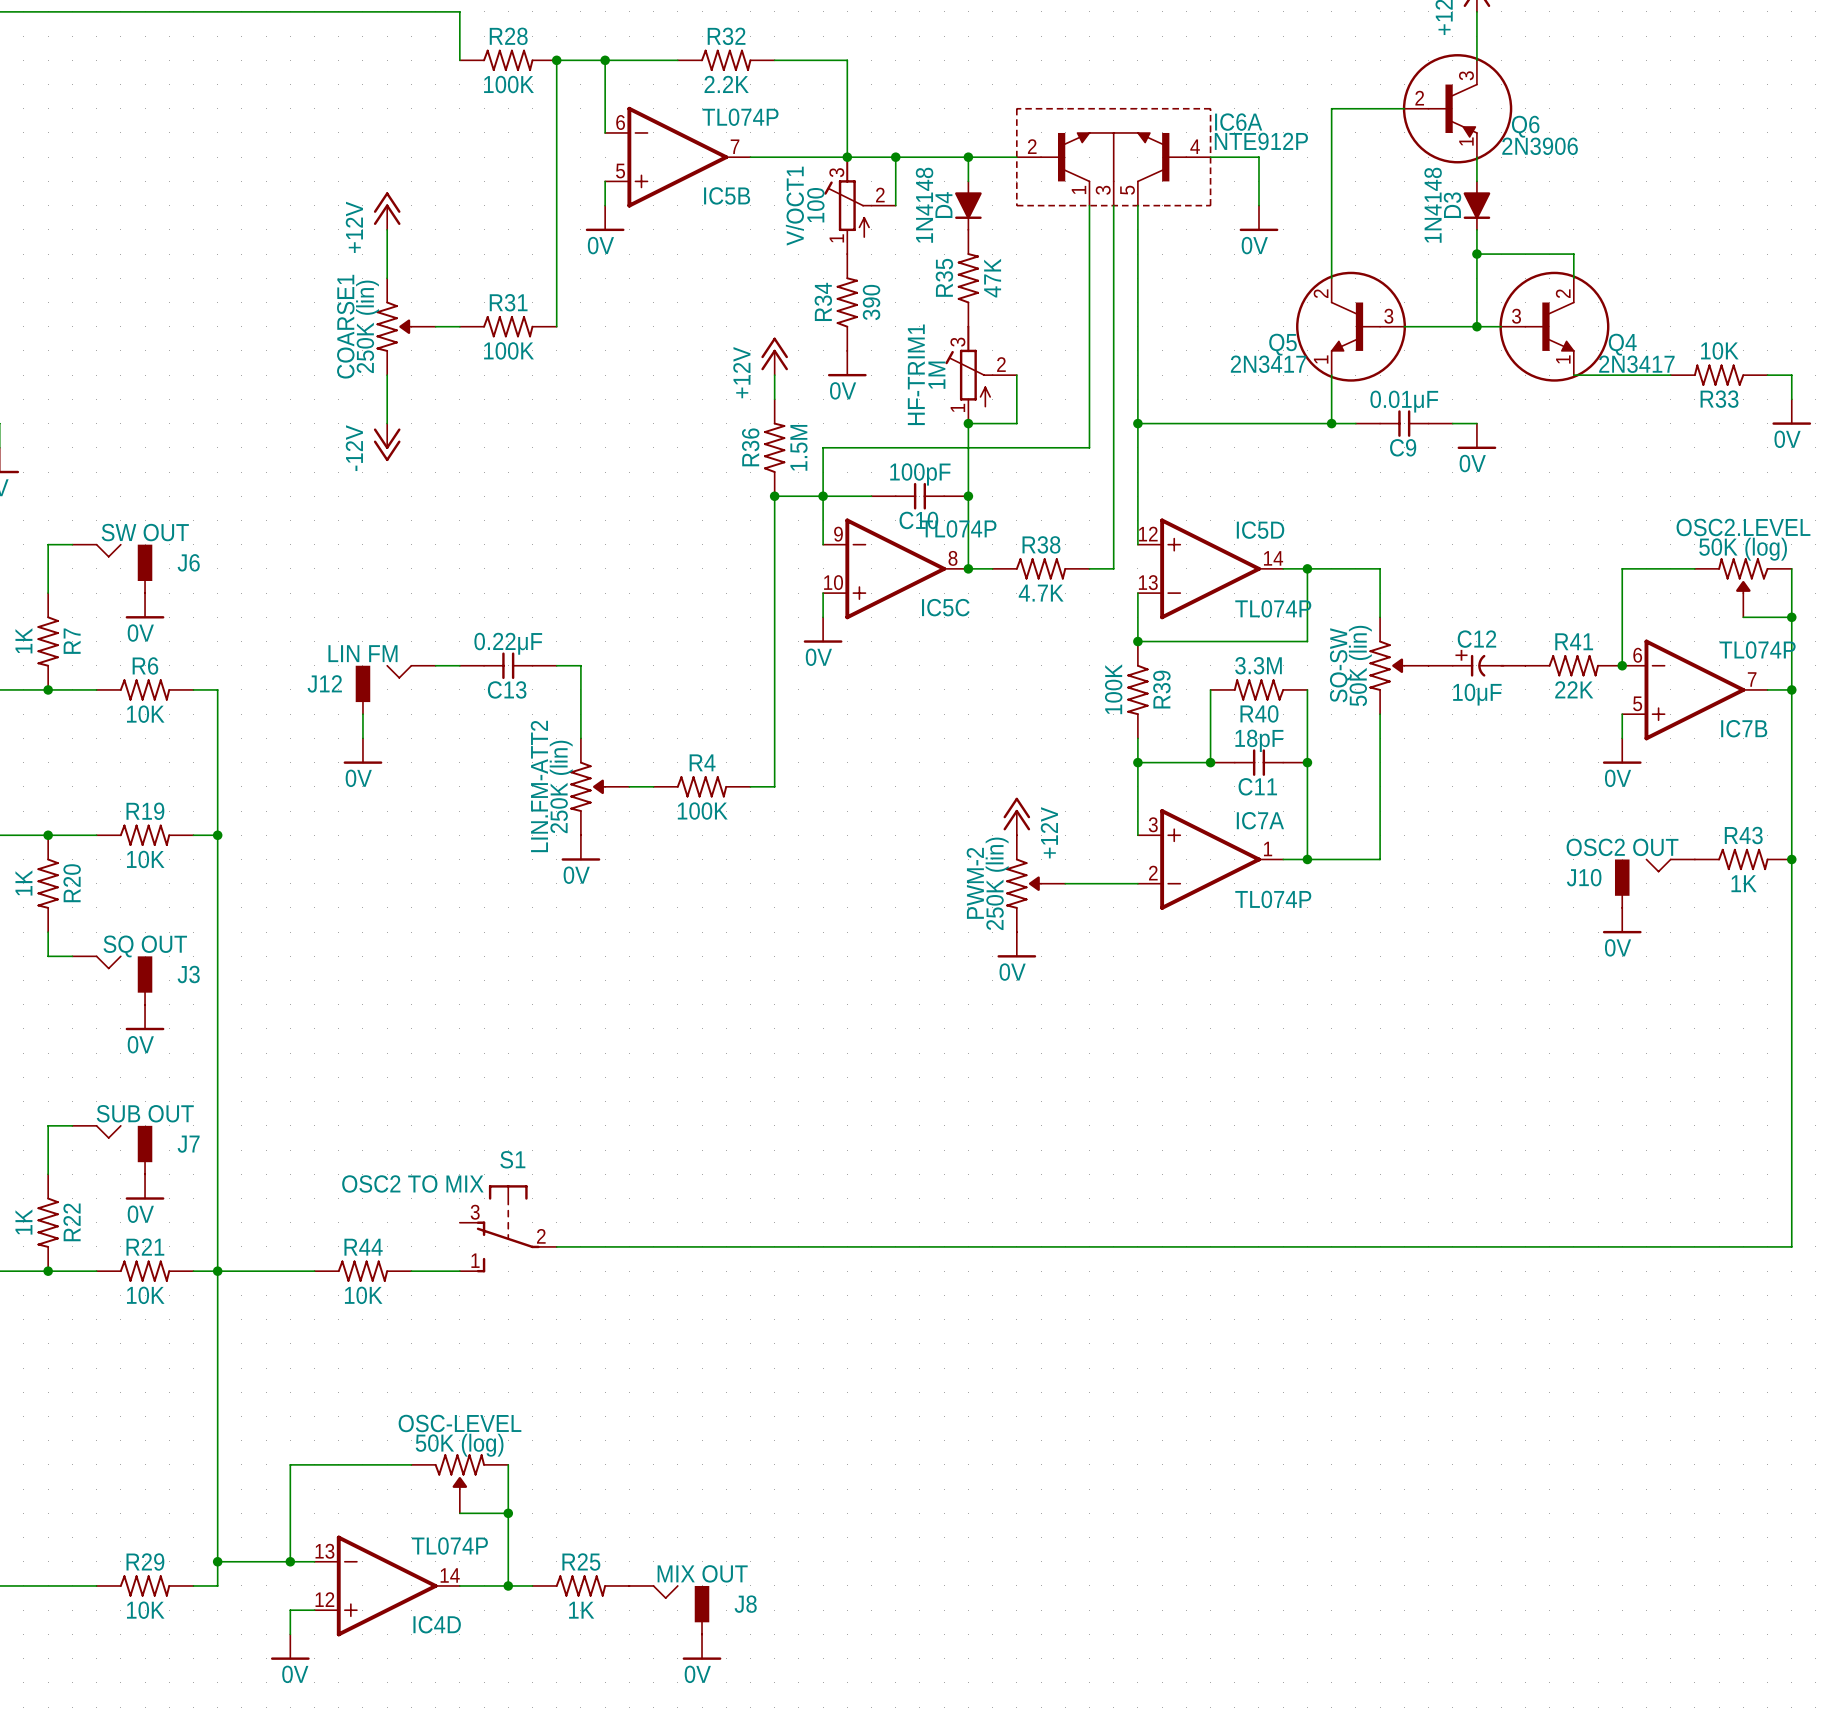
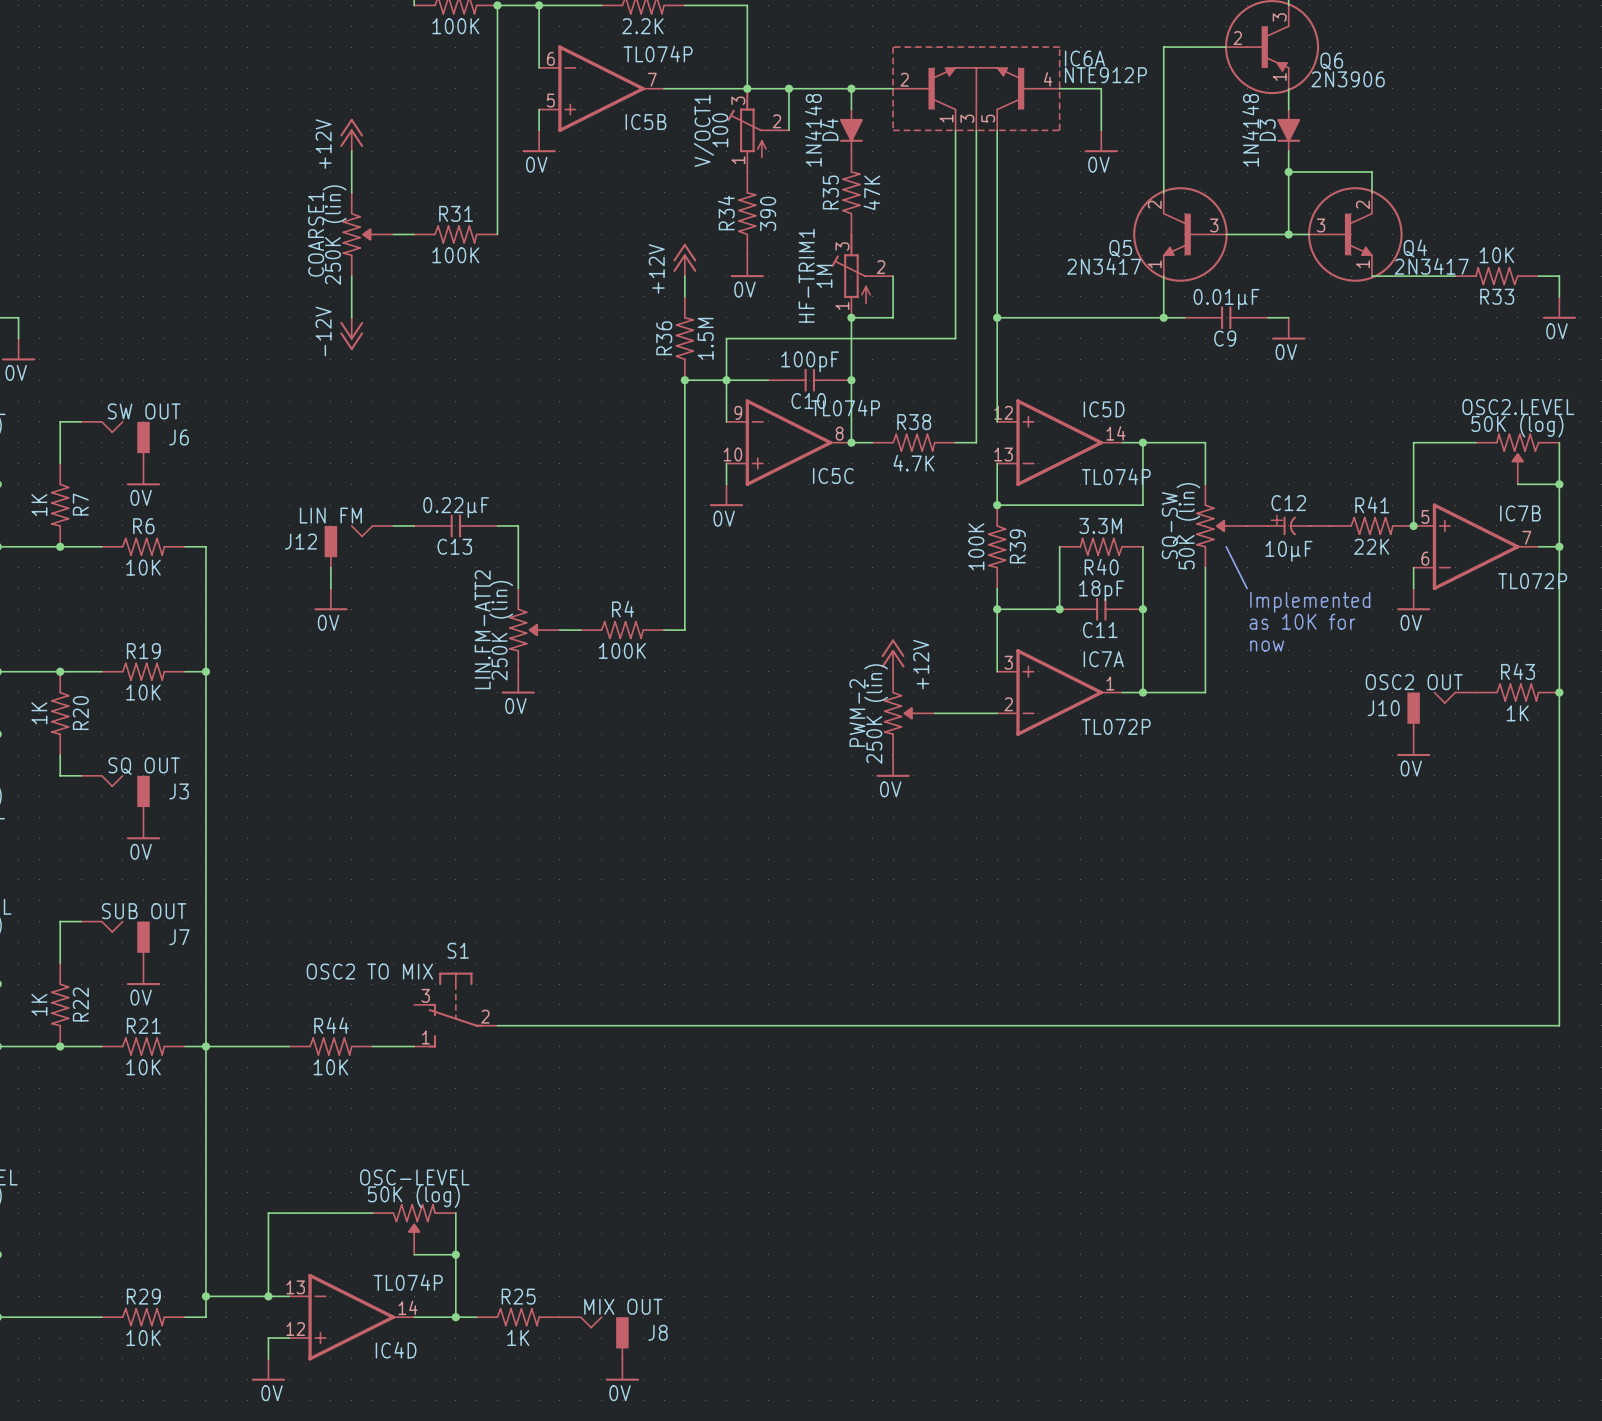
IC7B value: TL074P (1757, 650) -> TL072P (1532, 581)
line: none -> (1226, 546) (1247, 588)
IC7B flip: as is (1694, 689) -> up-down (1476, 546)
text: none -> Implemented (1310, 602)
text: none -> as 10K for (1302, 621)
text: none -> now (1267, 646)
IC7A value: TL074P (1273, 899) -> TL072P (1116, 726)

